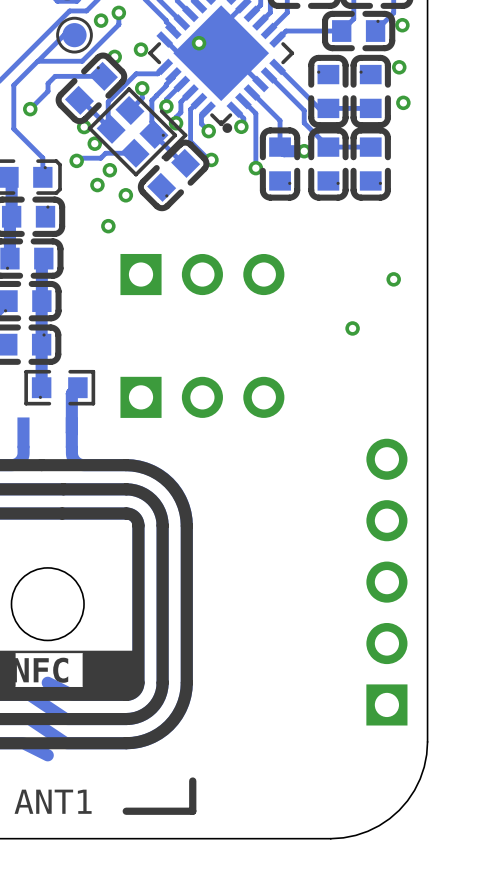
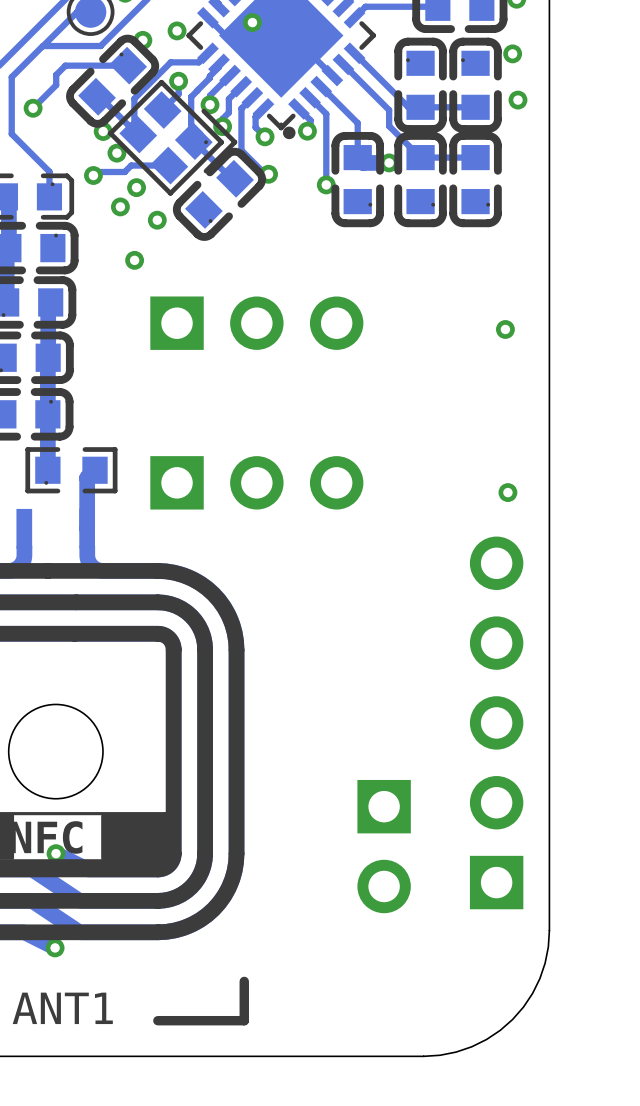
via position: (352, 328) -> (507, 492)
part: none -> (384, 846)
via: none -> (56, 853)
via: none -> (55, 947)

